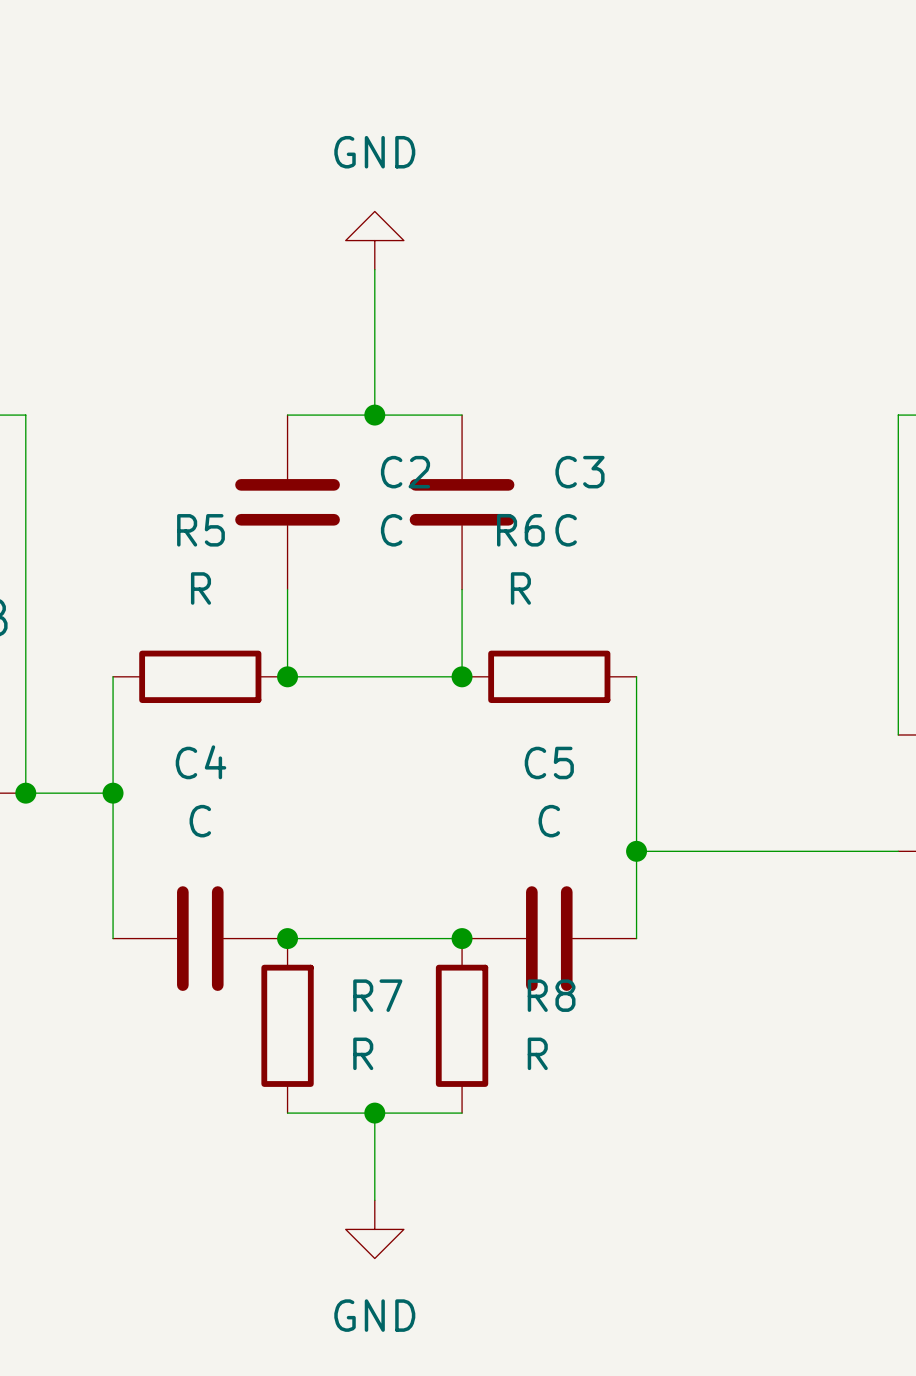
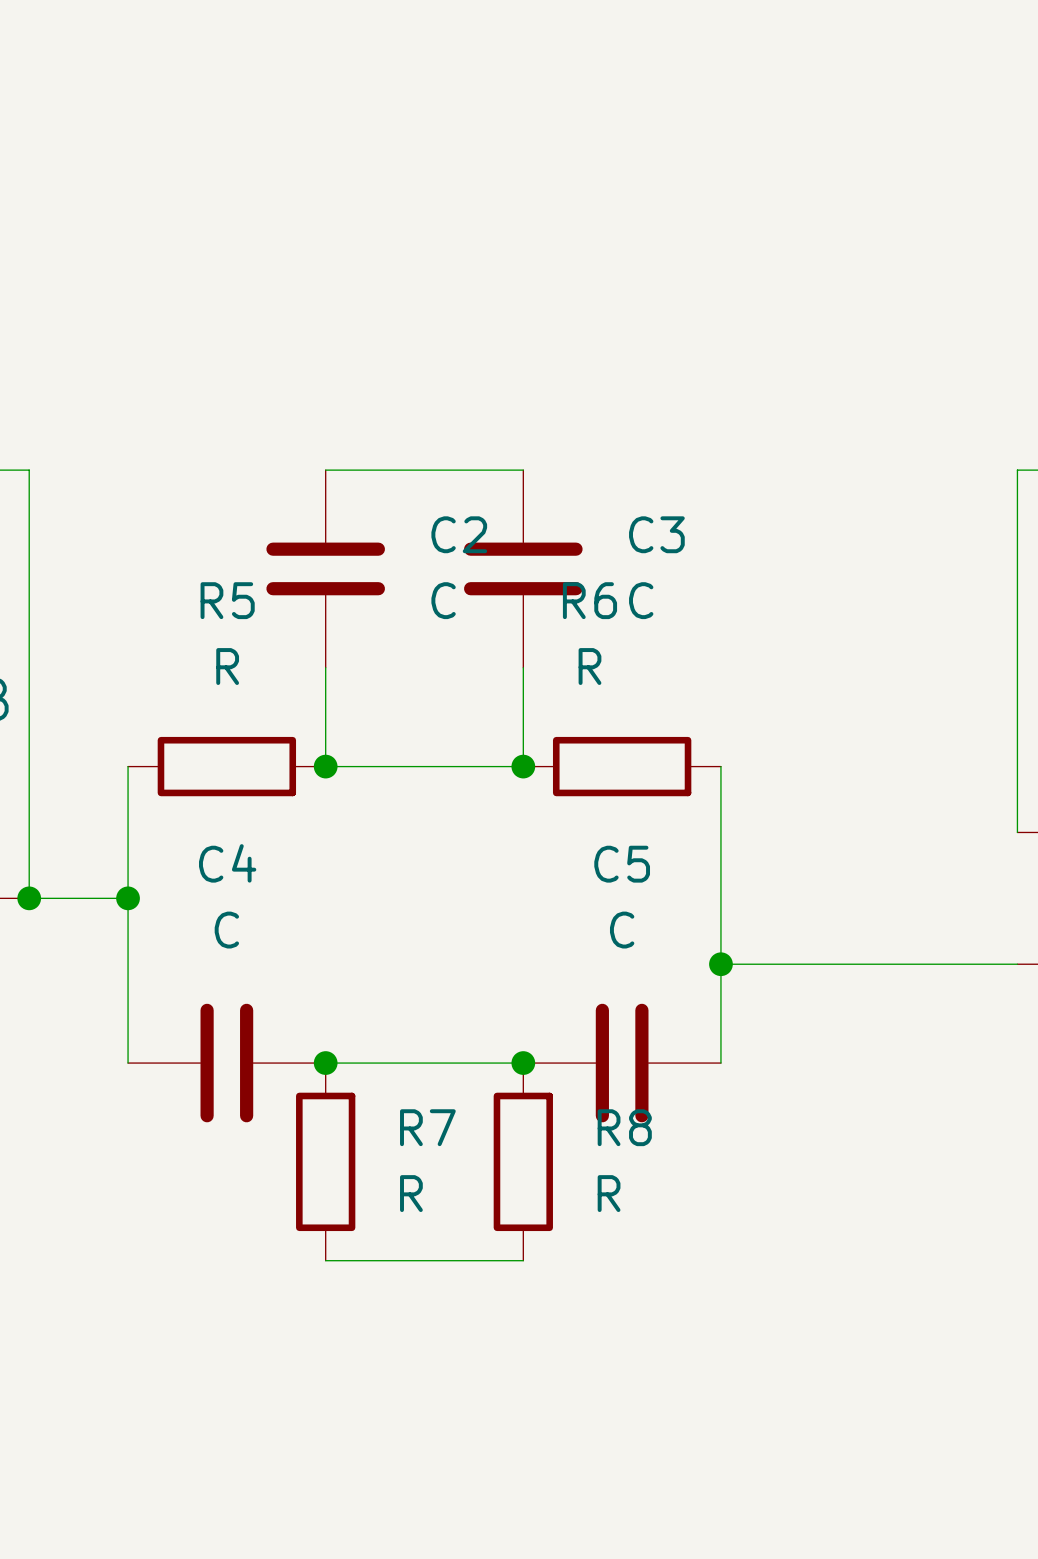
power symbol: GND (374, 240) -> none
wire: (374, 269) (374, 415) -> none
junction: (374, 415) -> none
wire: (374, 1113) (374, 1200) -> none
junction: (374, 1113) -> none
power symbol: GND (374, 1229) -> none

